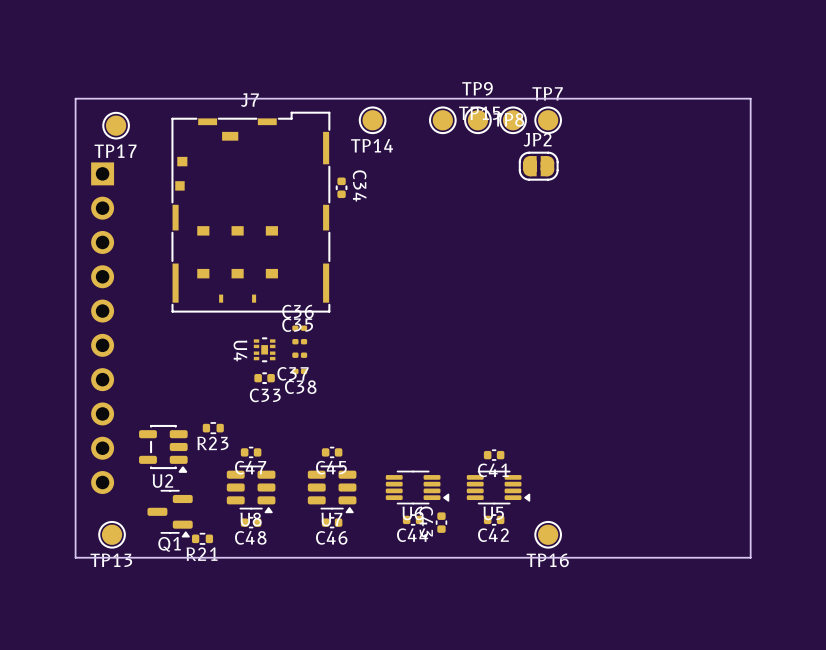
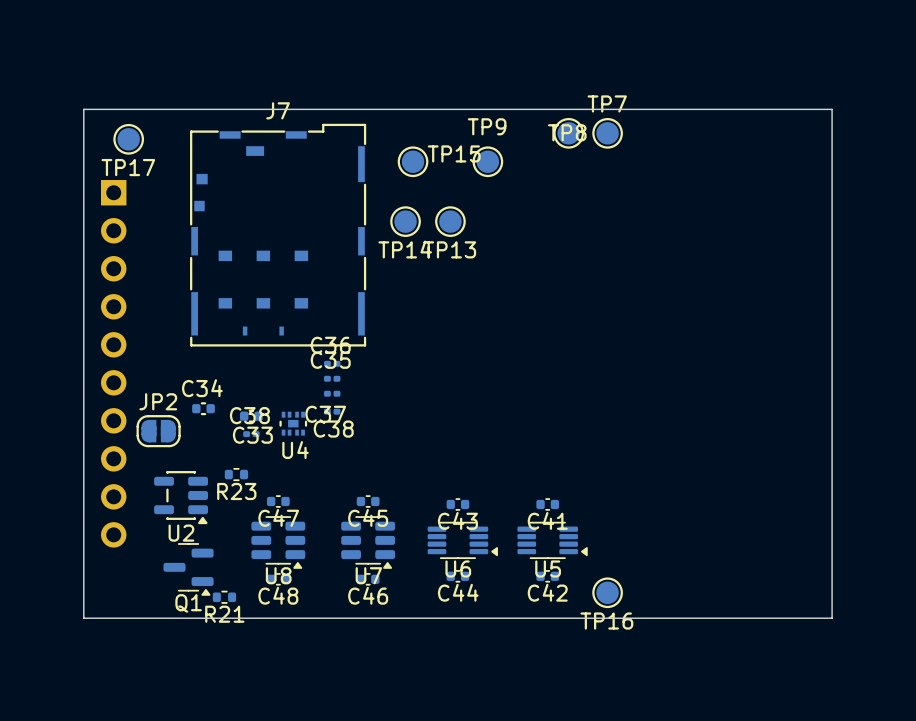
TP14 position: (372, 120) -> (405, 221)
TP15 position: (442, 120) -> (413, 161)
TP9 position: (477, 120) -> (487, 161)
JP2 position: (538, 166) -> (158, 431)
C34 rotation: 0° (341, 187) -> 90° clockwise (203, 408)
C34 position: (341, 187) -> (203, 408)
U4 rotation: 0° (264, 349) -> 90° clockwise (293, 423)
U4 position: (264, 349) -> (293, 423)
U4 name position: U4 (240, 350) -> U4 (295, 450)
C33 position: (264, 378) -> (251, 416)
C38: none -> (251, 434)
C43 rotation: 0° (441, 522) -> 90° clockwise (457, 504)
C43 position: (441, 522) -> (457, 504)
TP13 position: (112, 534) -> (450, 221)

